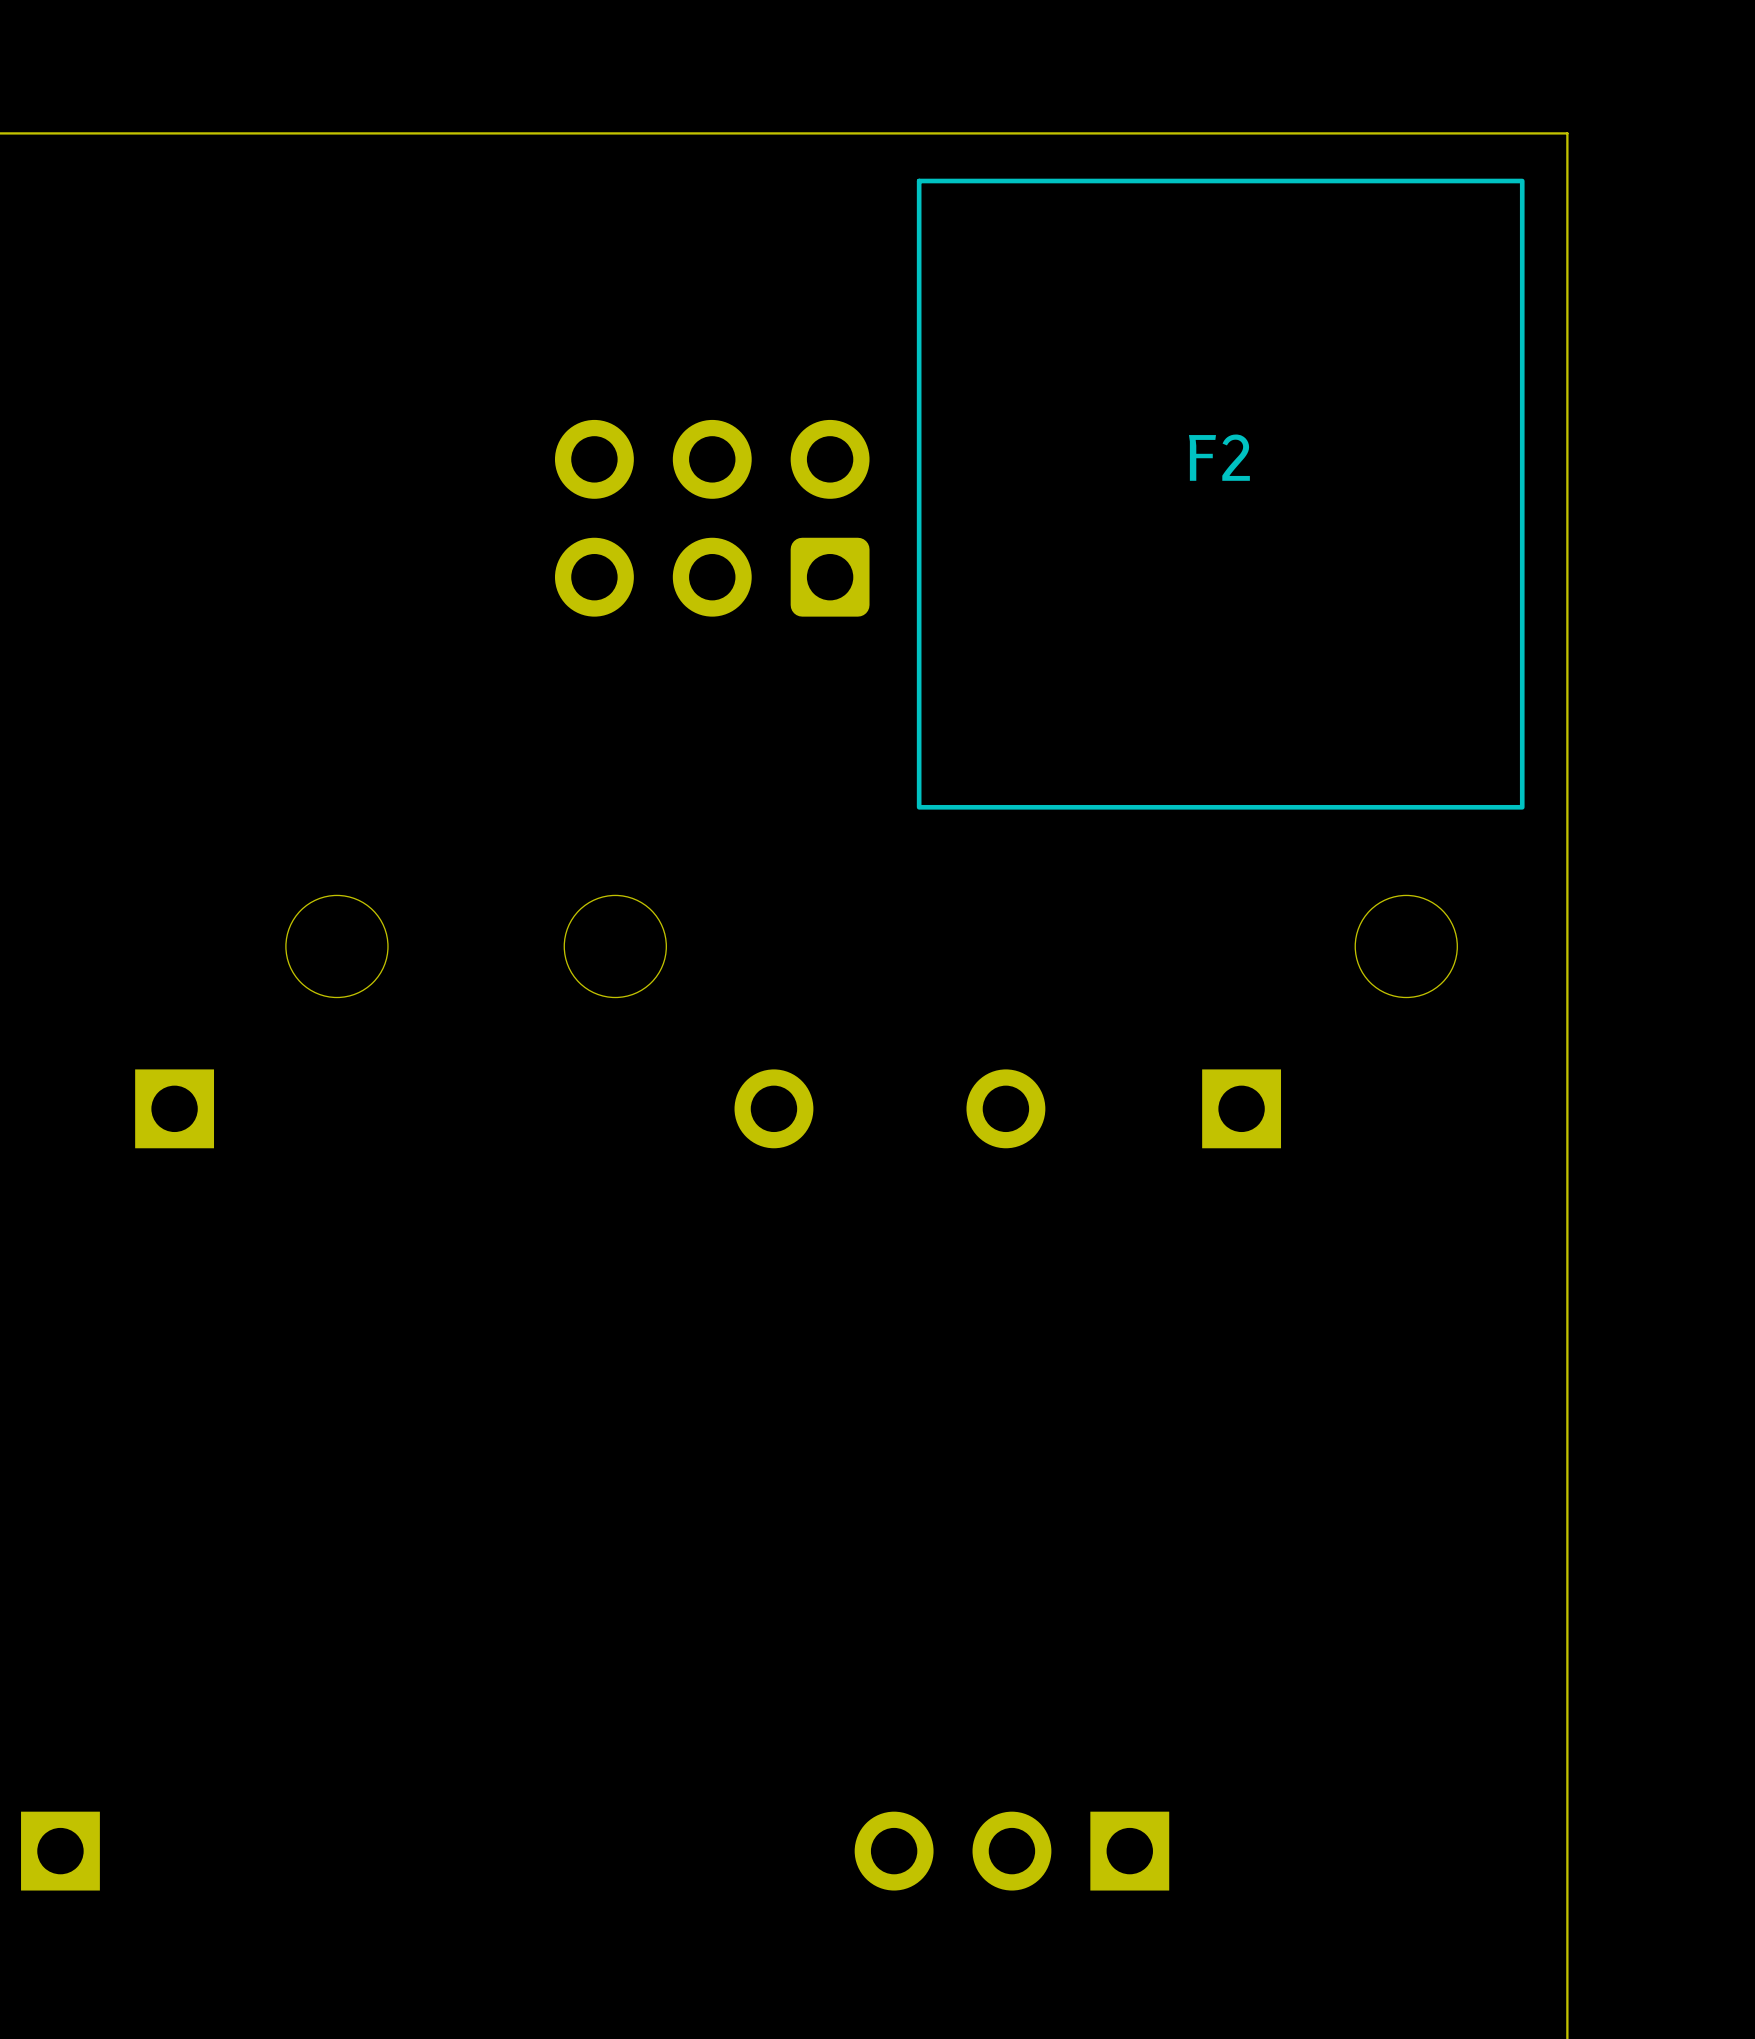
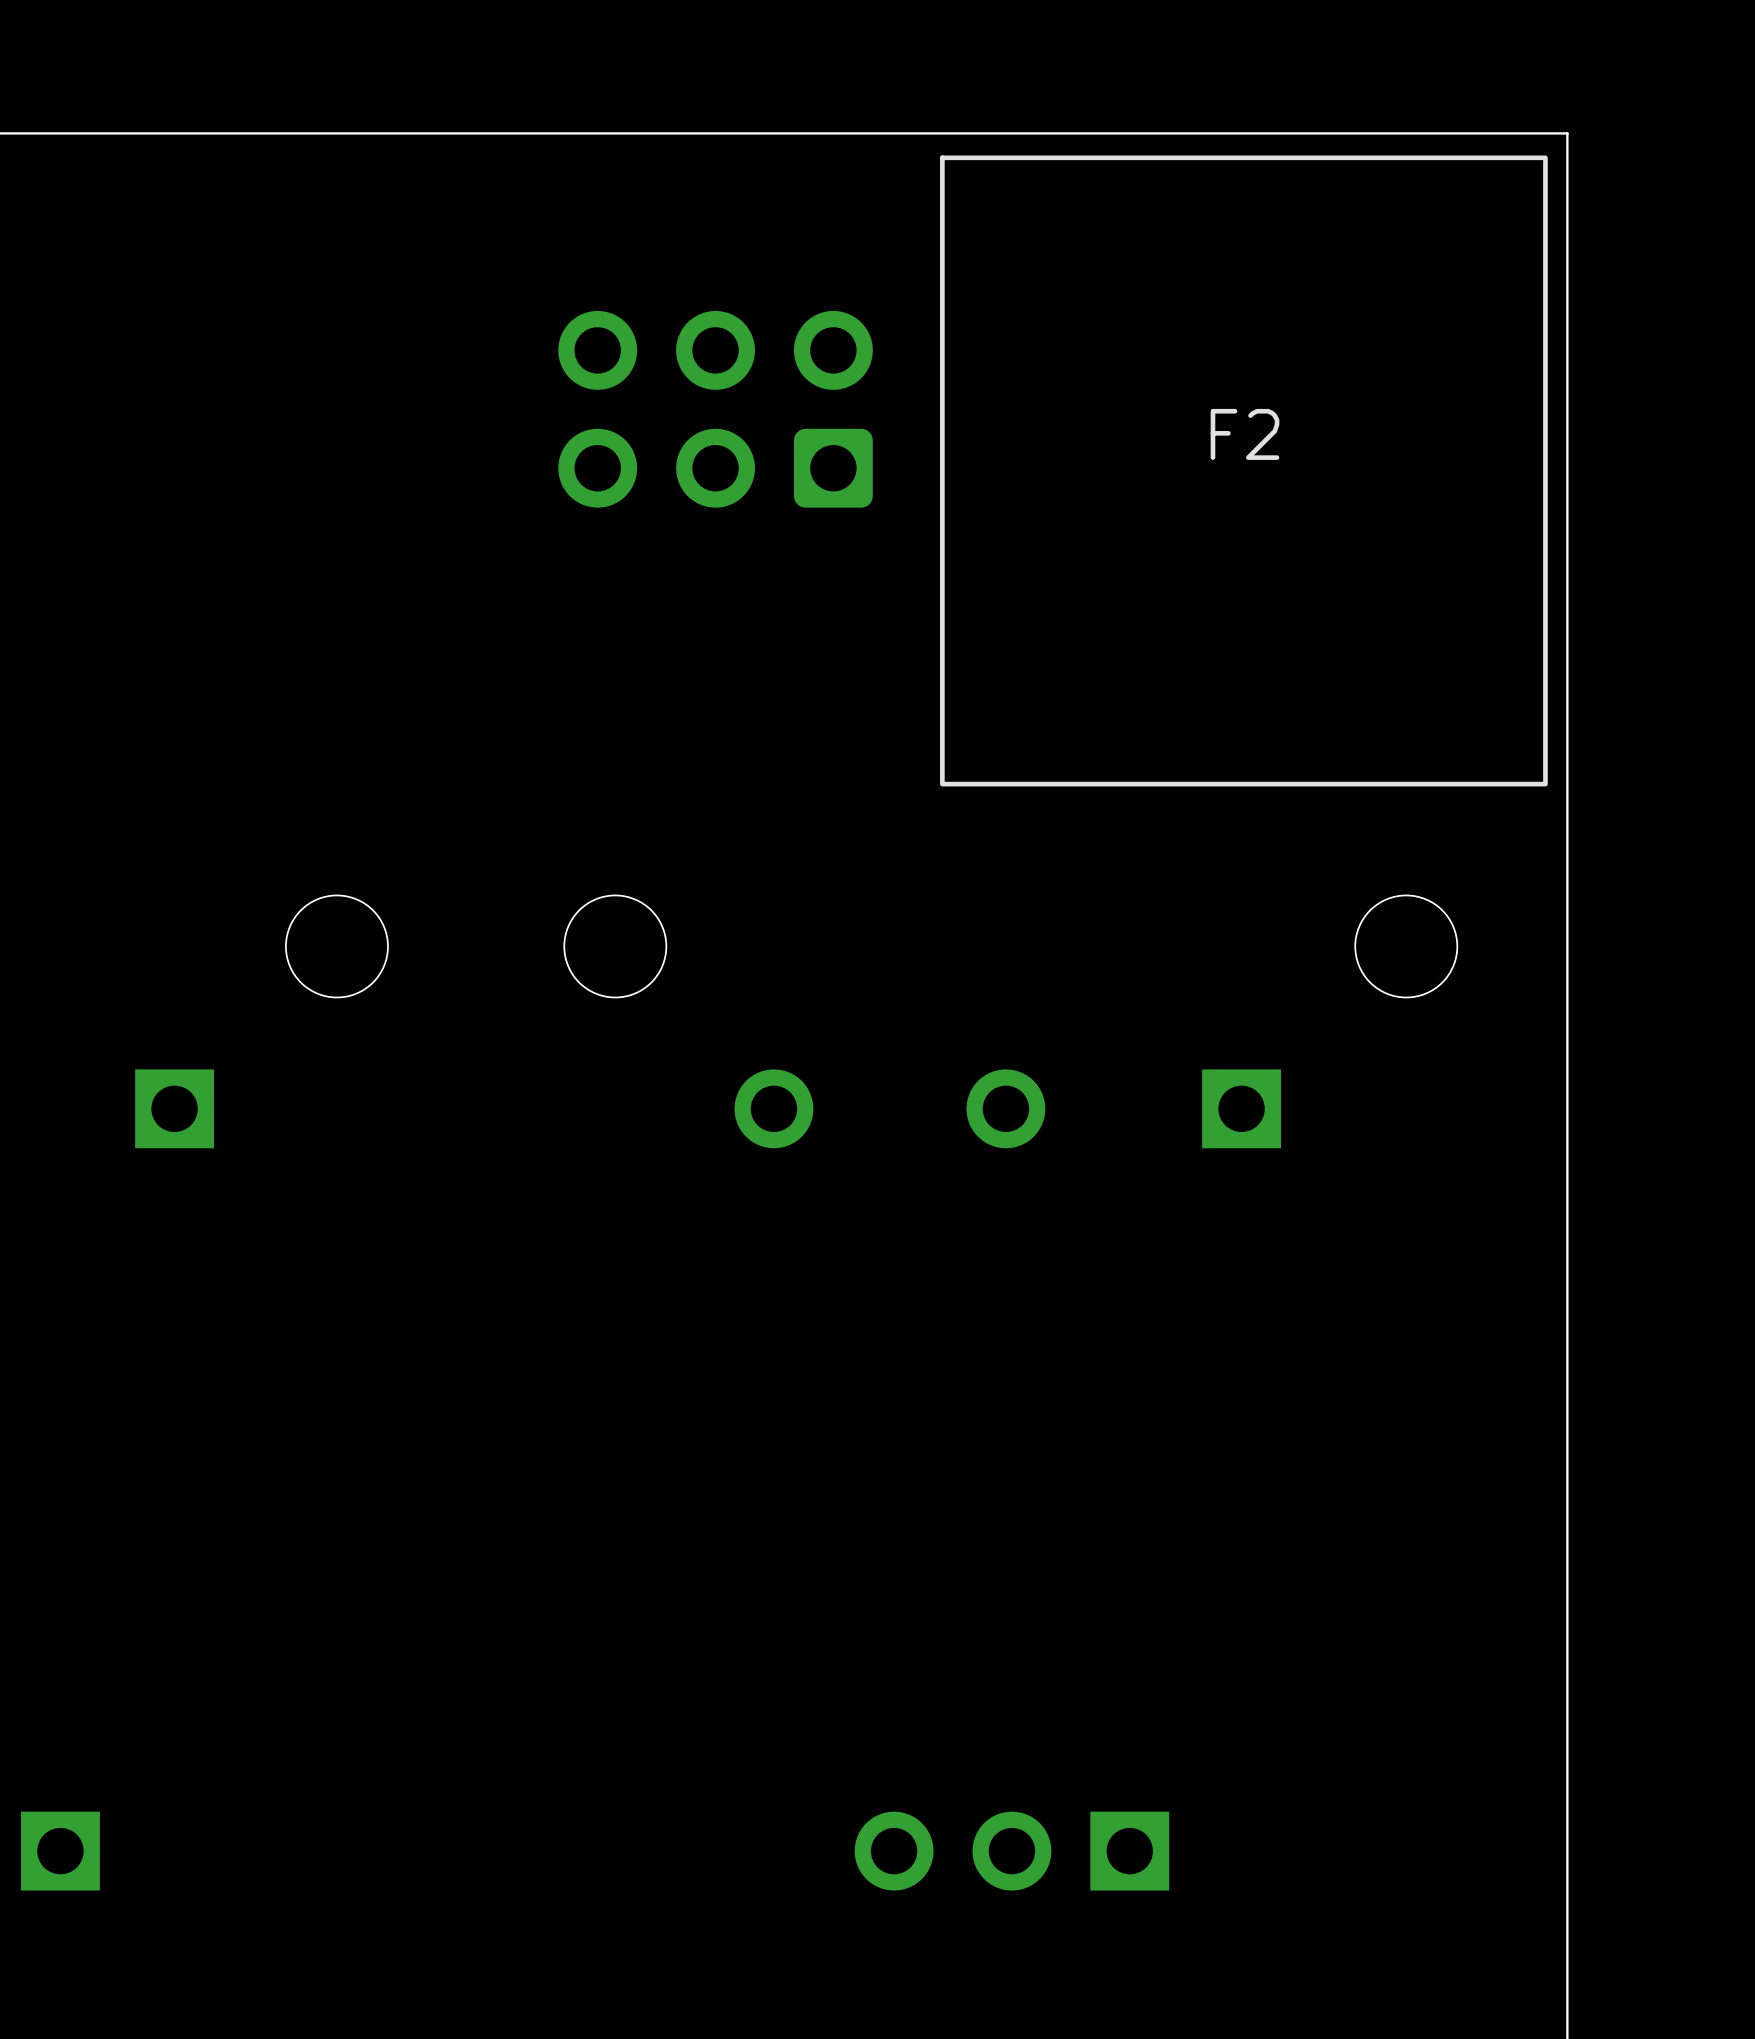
F2 position: (1220, 494) -> (1243, 470)
part position: (712, 518) -> (715, 409)

